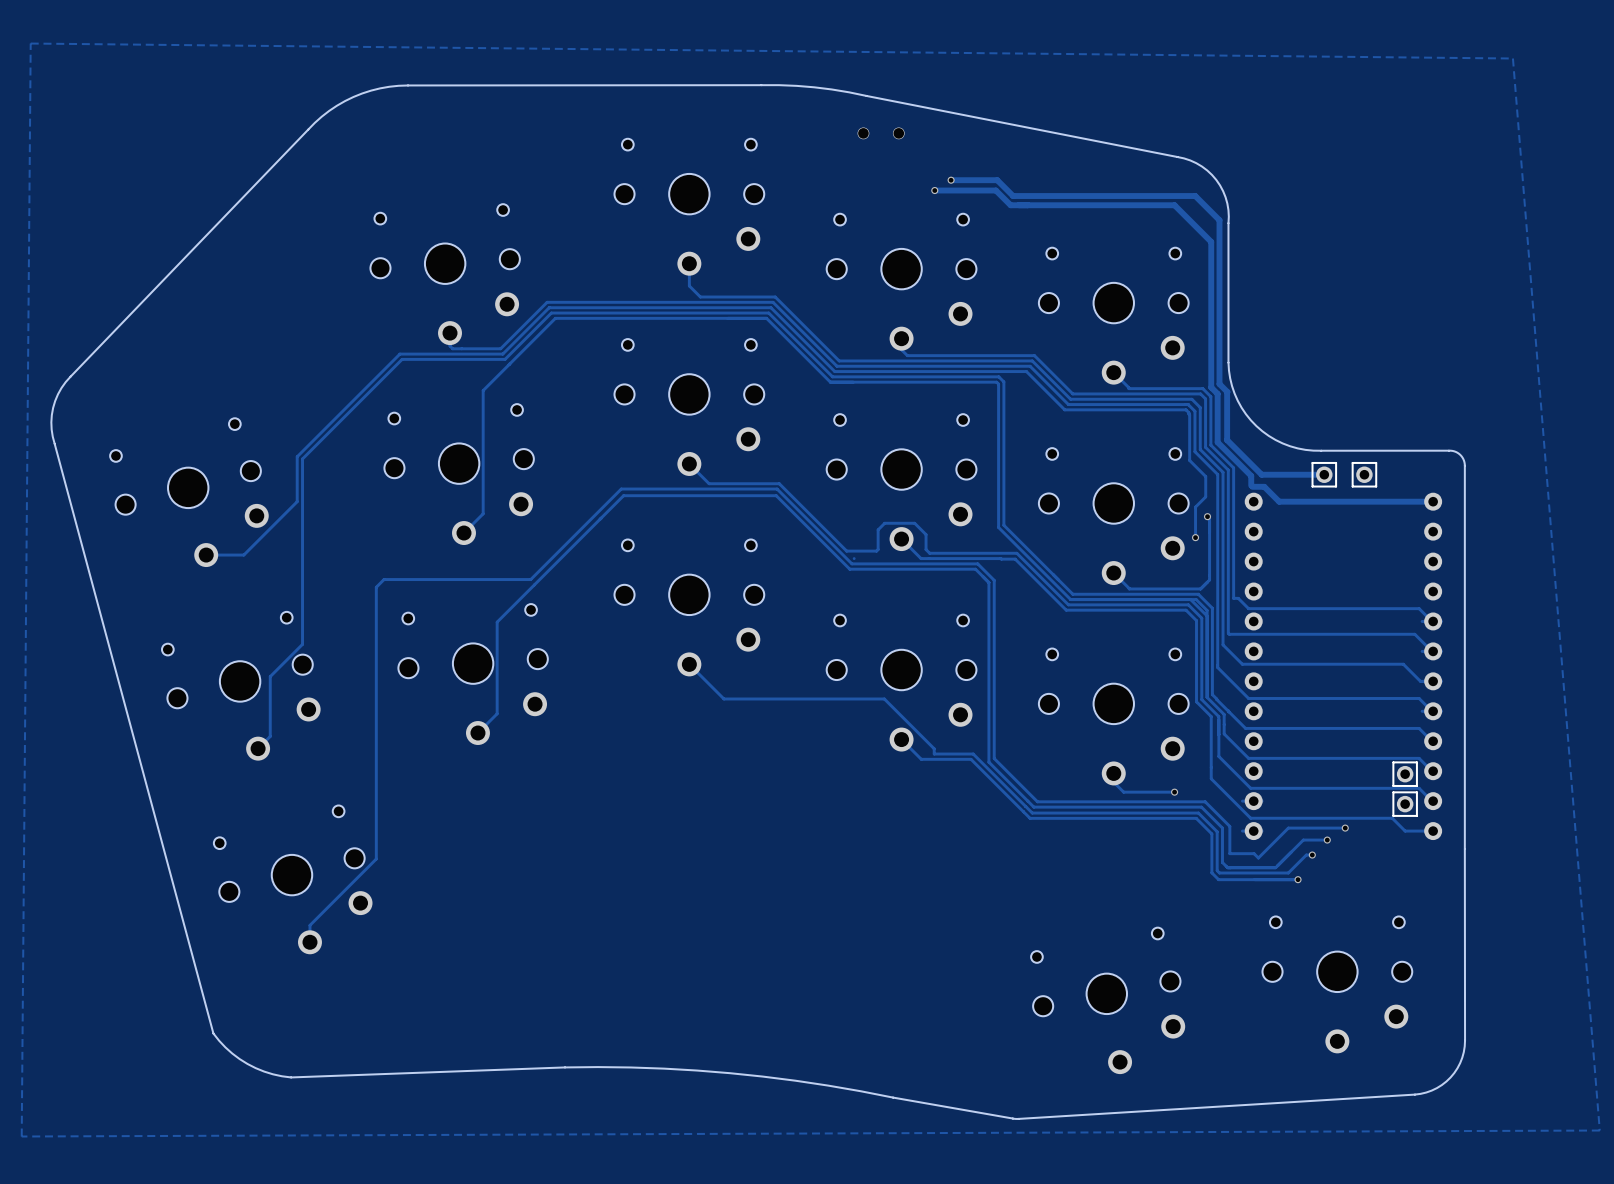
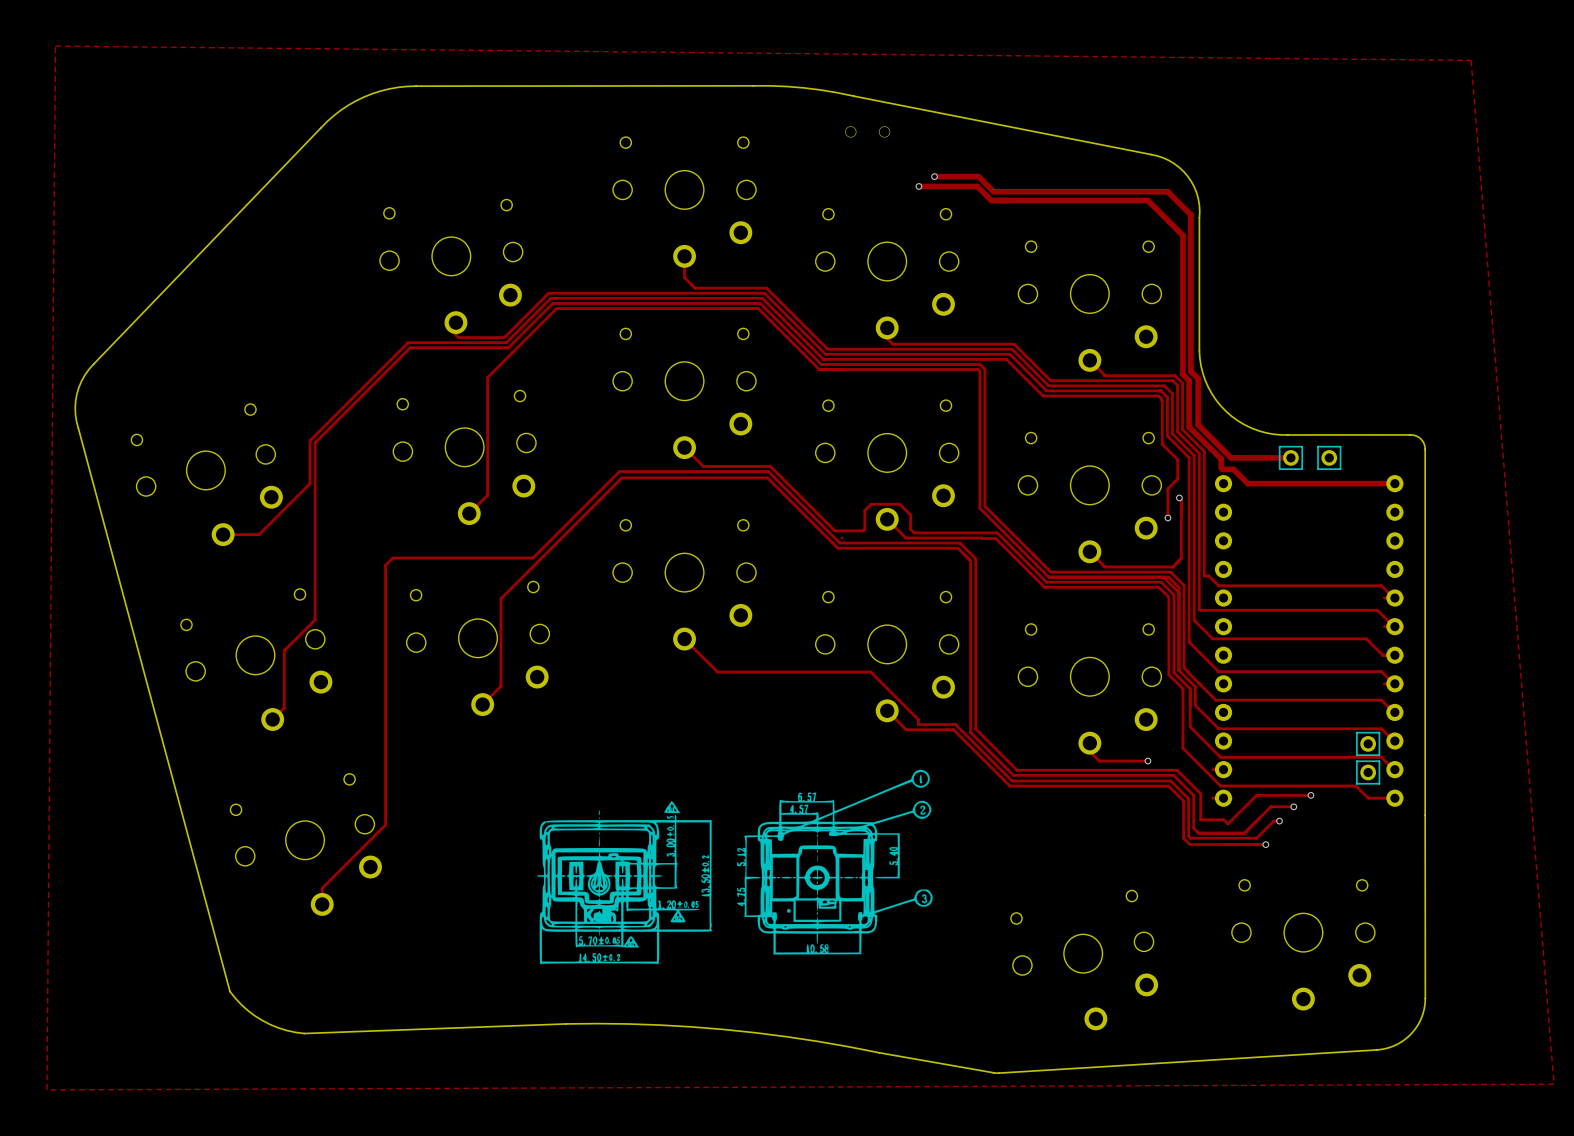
drawing: none -> [737, 769, 933, 955]
drawing: none -> [536, 801, 713, 965]

